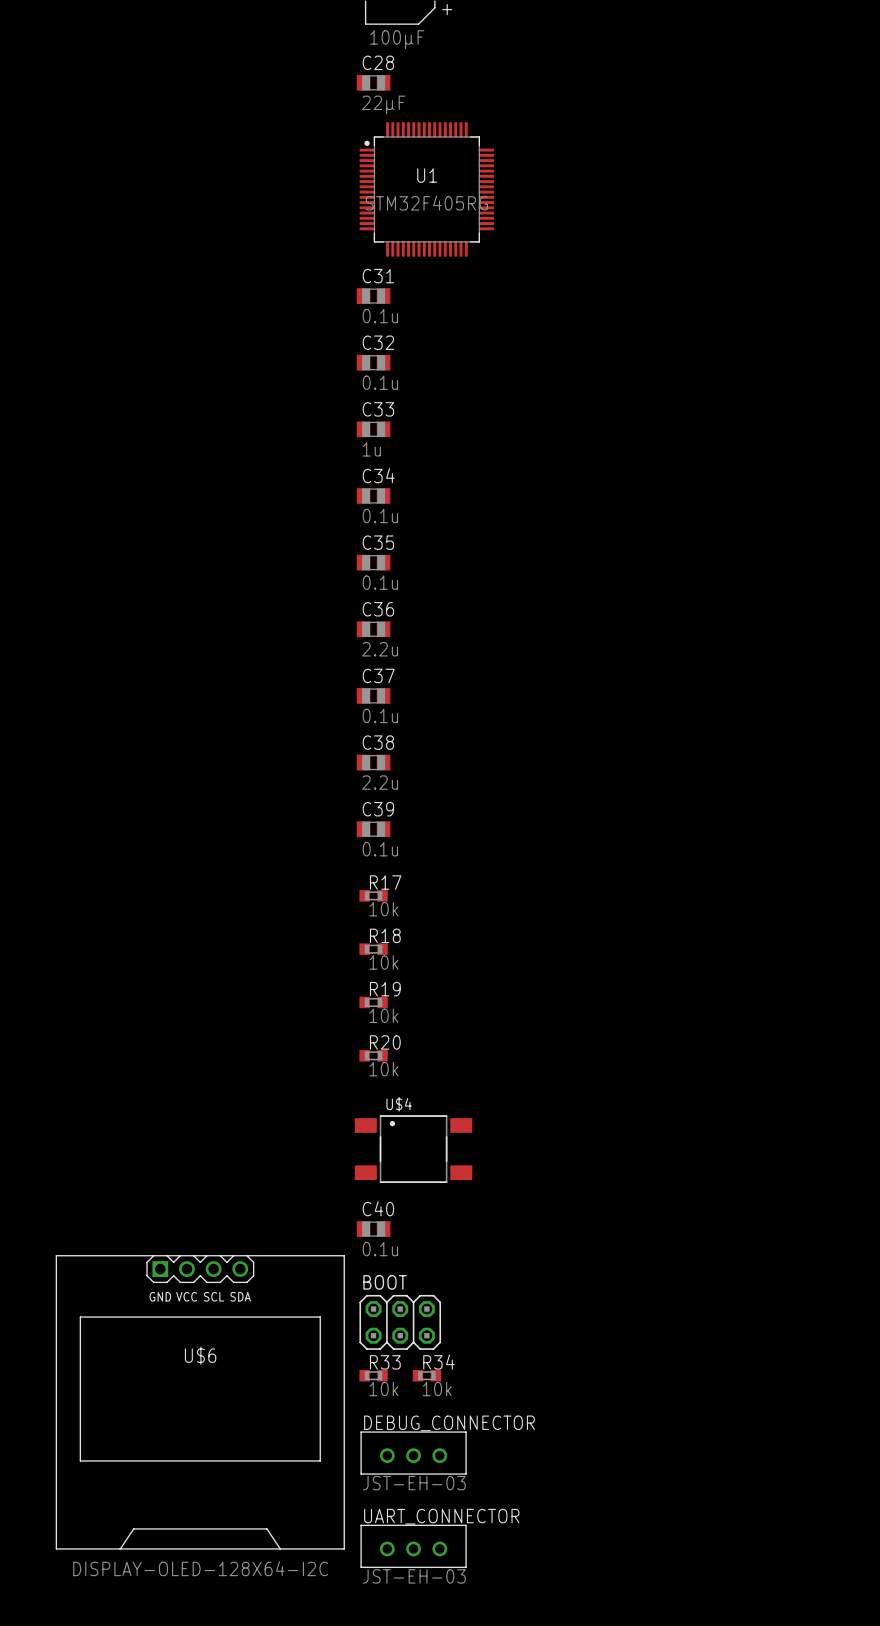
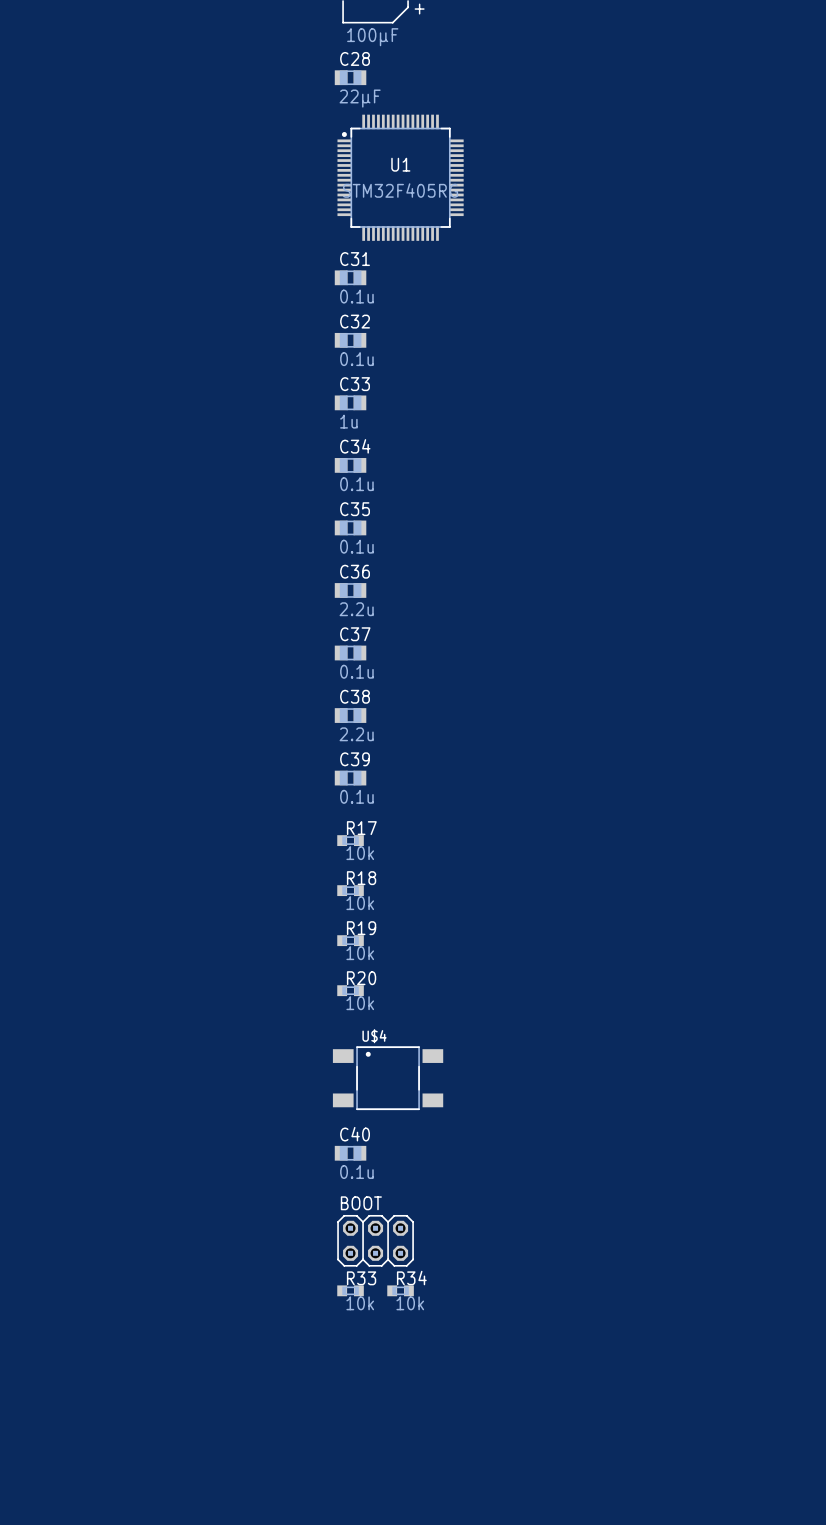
U$6: DISPLAY-OLED-128X64-I2C (200, 1402) -> none
DEBUG_CONNECTOR: JST-EH-03 (413, 1453) -> none
UART_CONNECTOR: JST-EH-03 (413, 1546) -> none

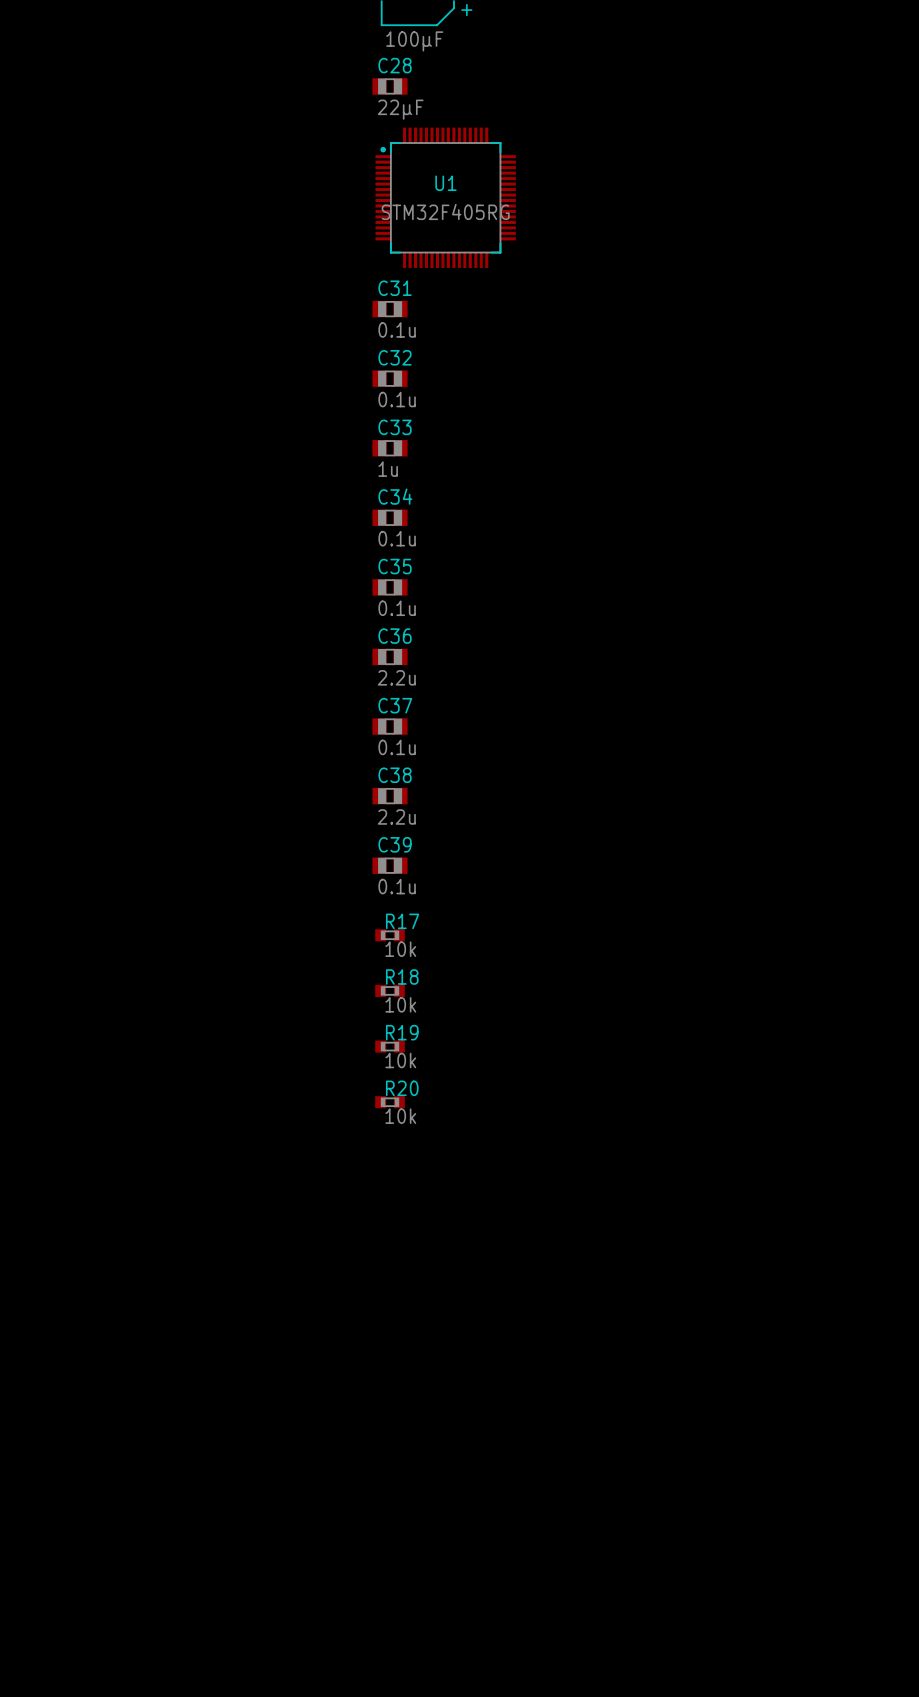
U$4: (388, 1078) -> none
C40: 0.1u (350, 1153) -> none
BOOT: (375, 1240) -> none
R33: 10k (350, 1290) -> none
R34: 10k (400, 1290) -> none

